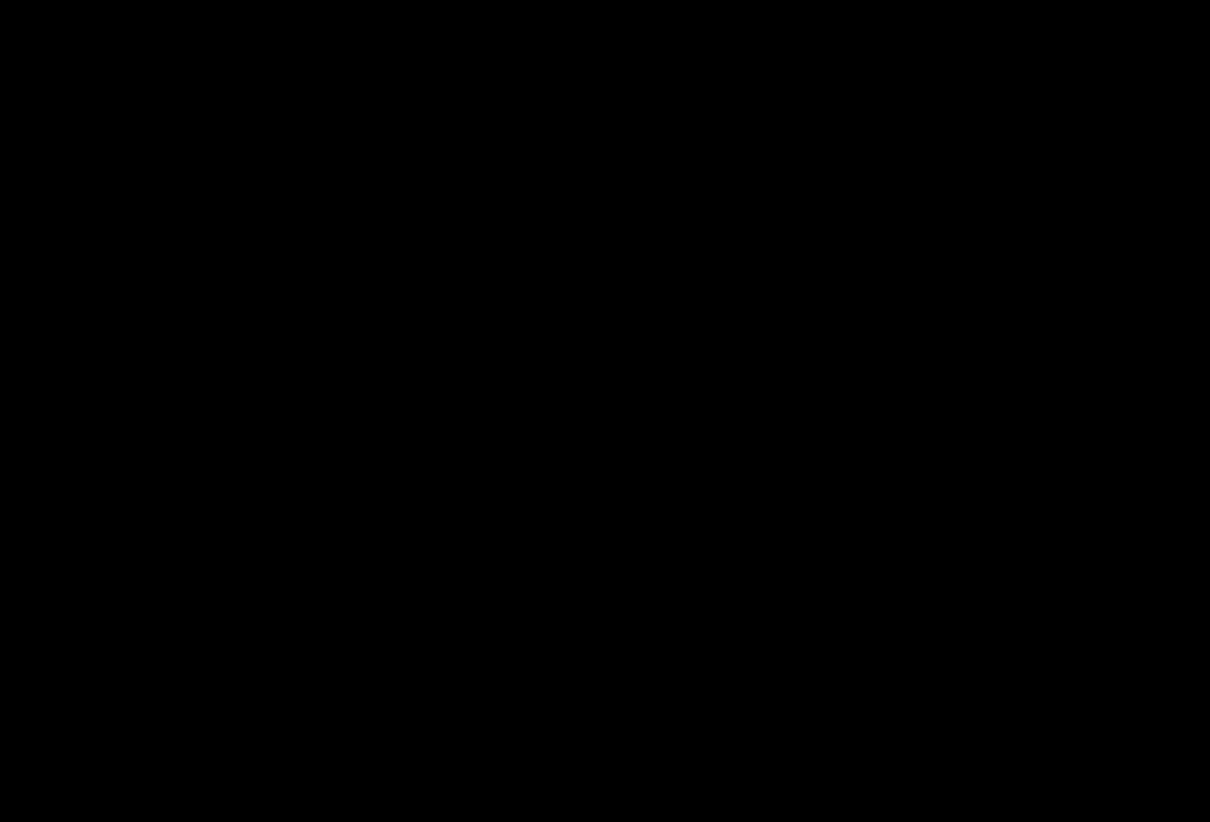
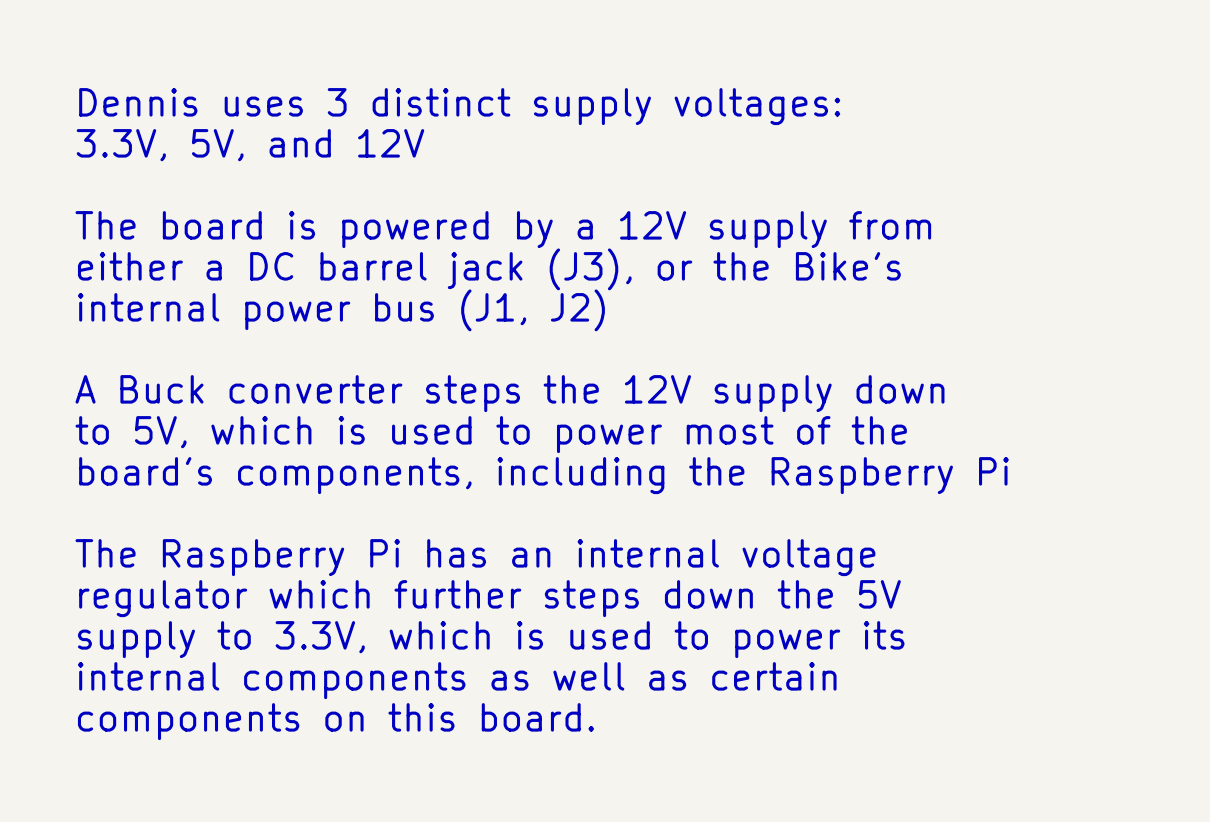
text: none -> Dennis uses 3 distinct supply voltages: (459, 106)
text: none -> 3.3V, 5V, and 12V (250, 145)
text: none -> The board is powered by a 12V supply from (503, 229)
text: none -> either a DC barrel jack (J3), or the Bike's (489, 269)
text: none -> internal power bus (J1, J2) (341, 310)
text: none -> A Buck converter steps the 12V supply down (510, 393)
text: none -> to 5V, which is used to power most of the (491, 434)
text: none -> board's components, including the Raspberry Pi (543, 475)
text: none -> The Raspberry Pi has an internal voltage (475, 557)
text: none -> regulator which further steps down the 5V (489, 598)
text: none -> supply to 3.3V, which is used to power its (491, 639)
text: none -> internal components as well as certain (457, 680)
text: none -> components on this board. (335, 721)

